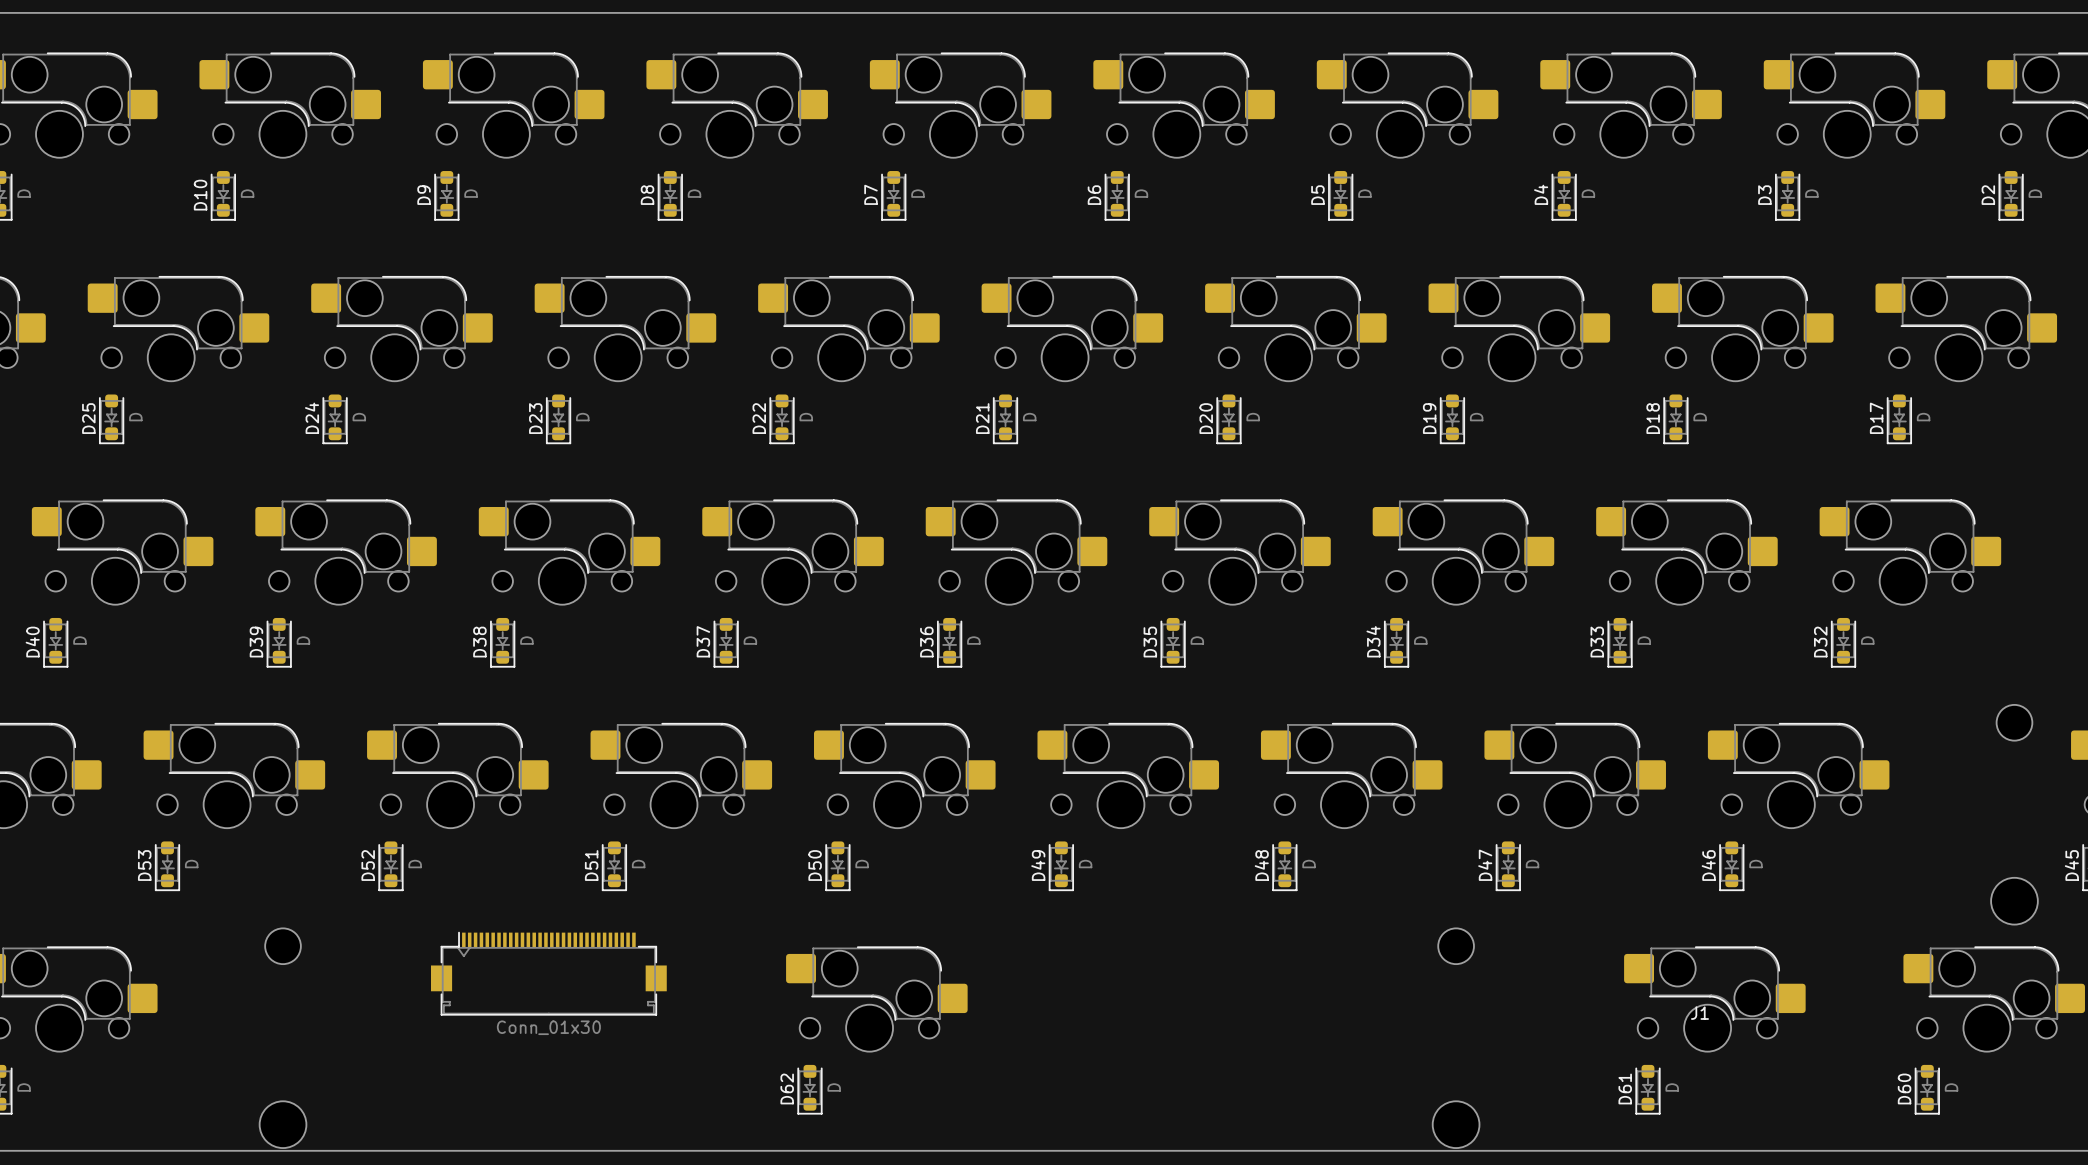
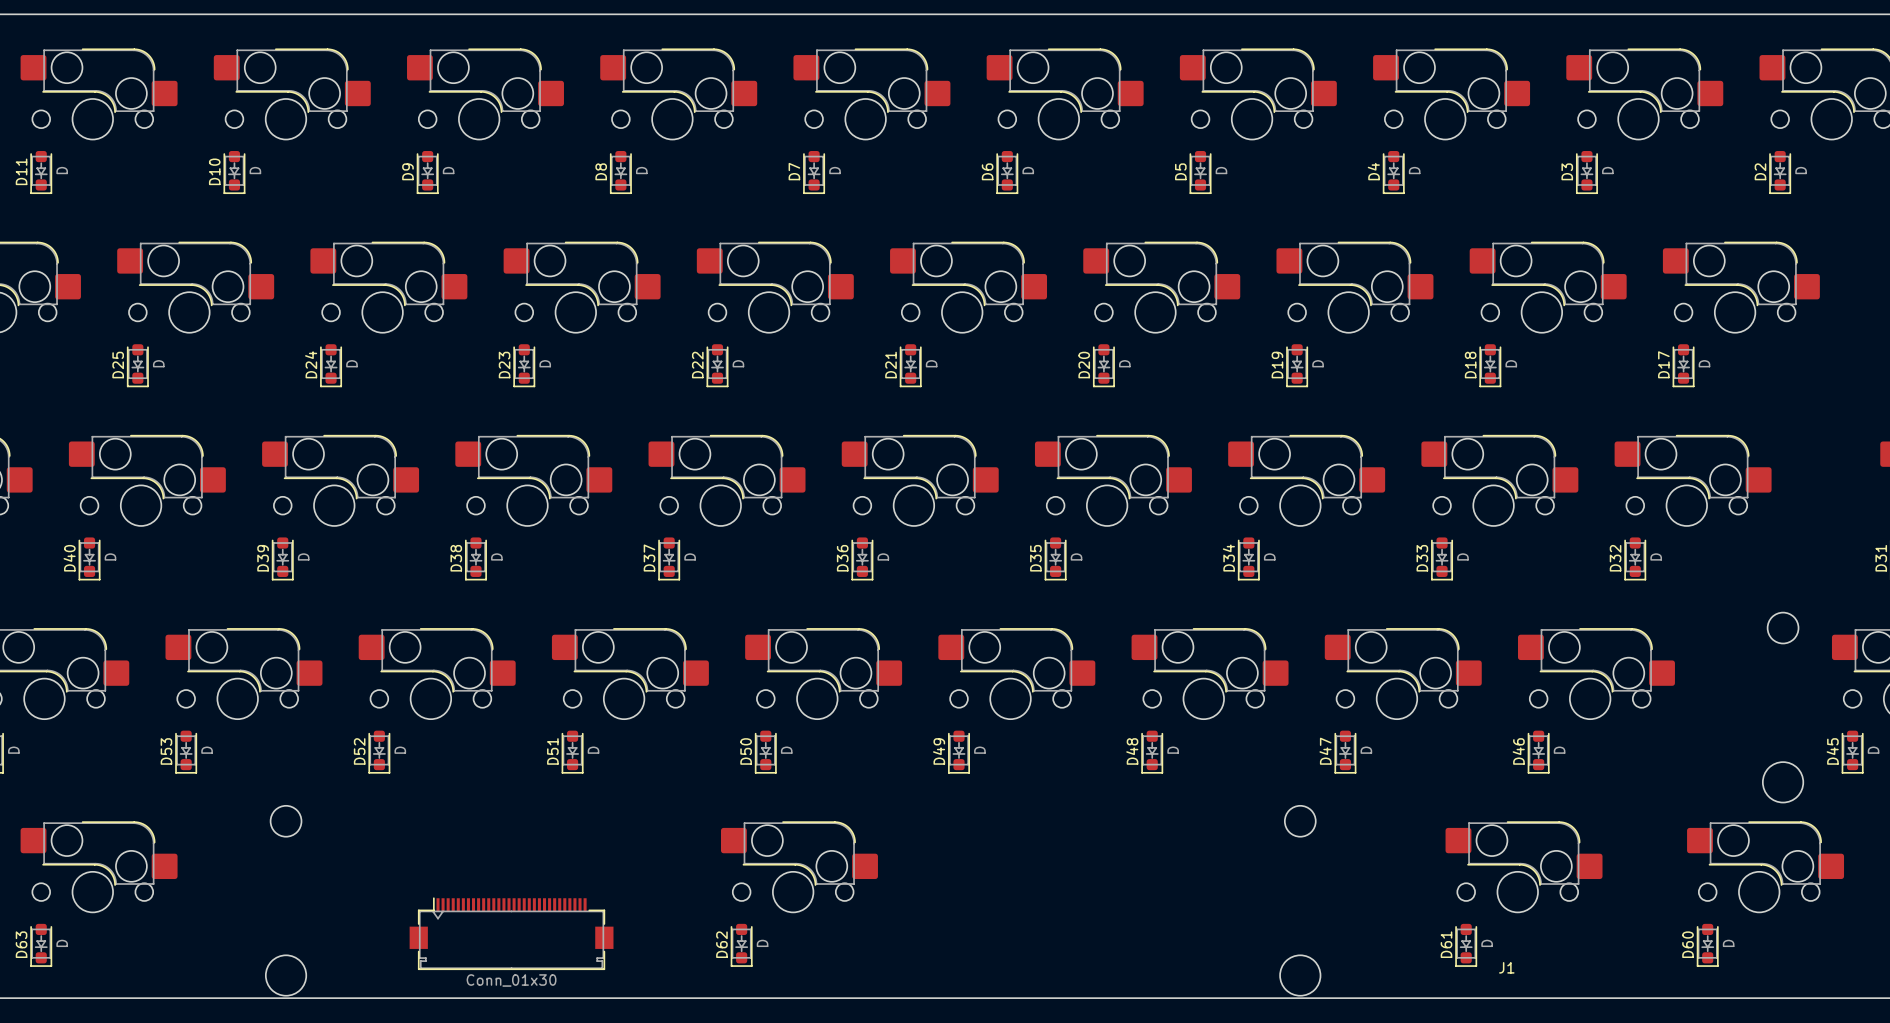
J1 position: (548, 973) -> (511, 933)

